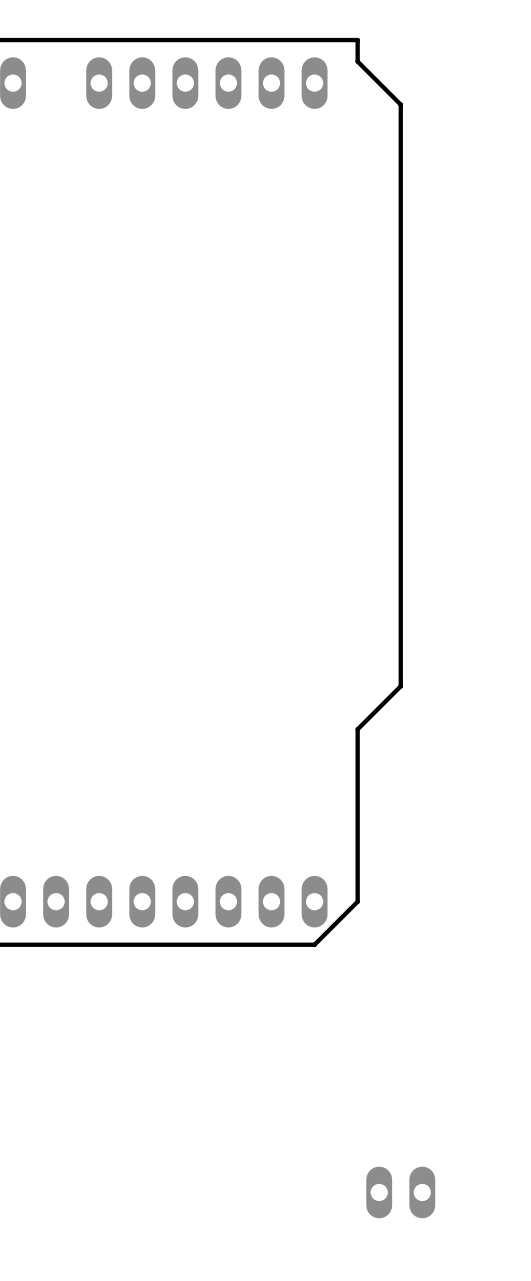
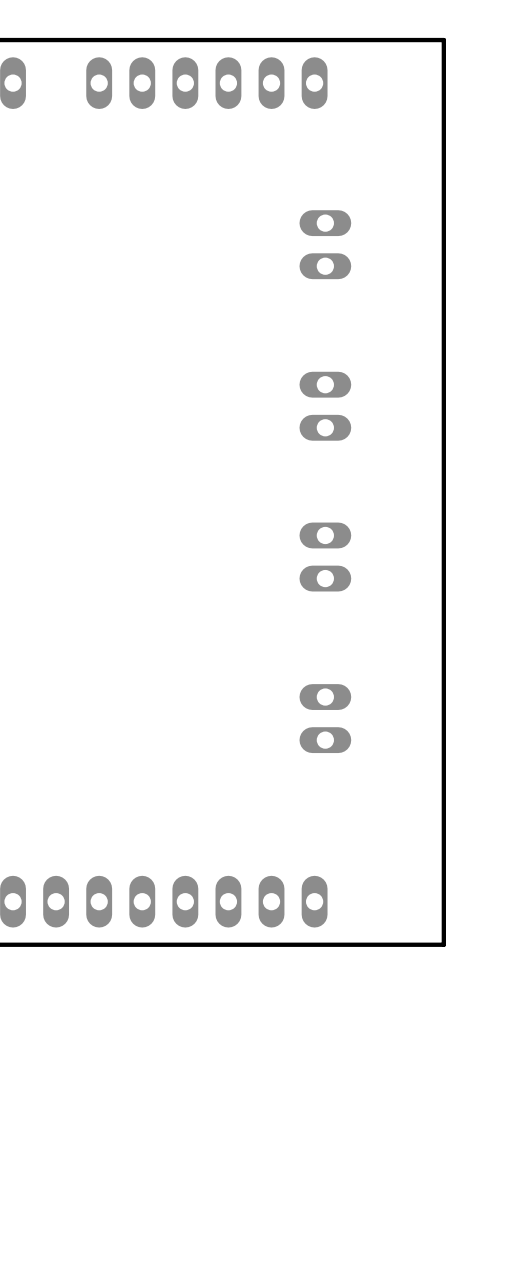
board edge: (357, 40) (357, 61) (400, 104) (400, 686) (357, 729) (357, 901) (314, 944) -> (357, 40) (443, 40) (443, 944) (314, 944)
part: none -> (325, 244)
part: none -> (325, 406)
part: none -> (325, 557)
part: none -> (325, 718)
part: (400, 1192) -> none

